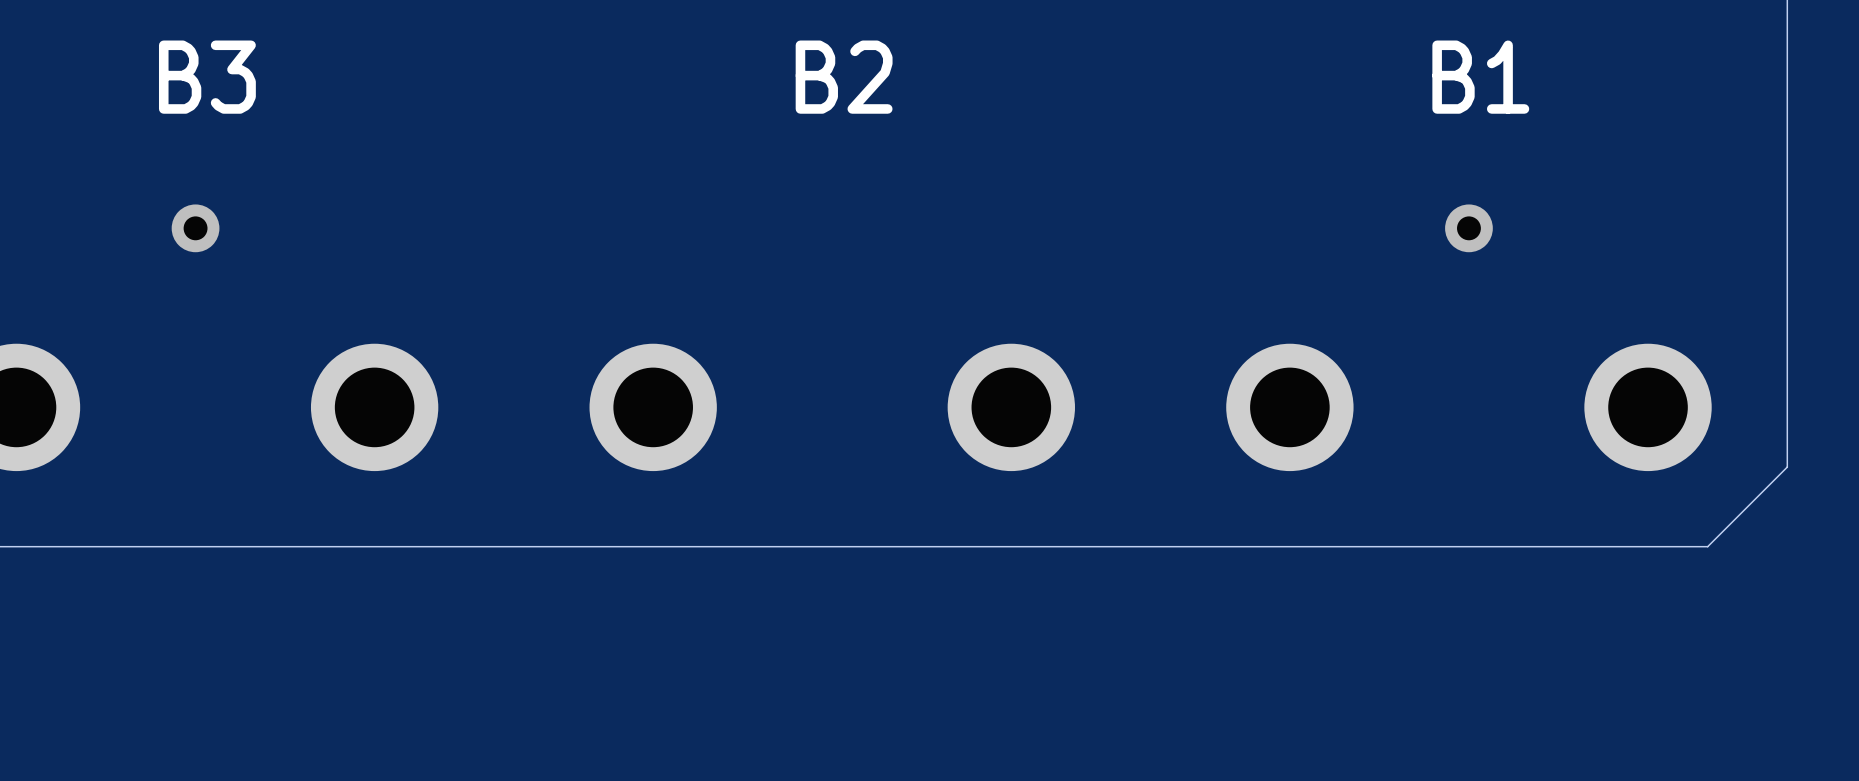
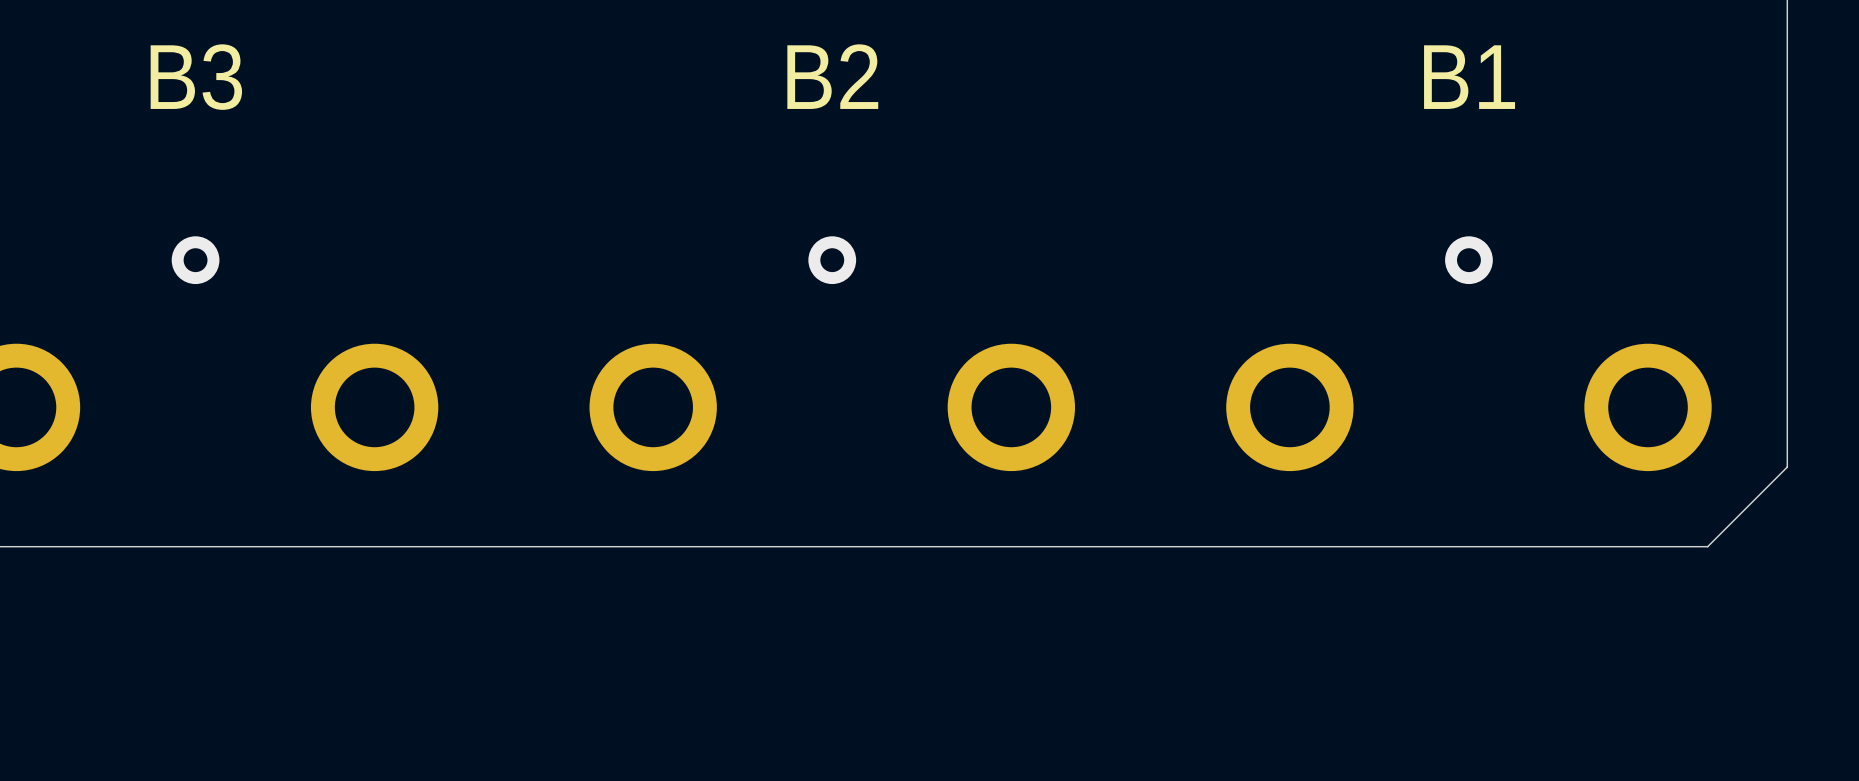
via position: (195, 228) -> (195, 260)
via position: (1468, 228) -> (1468, 260)
via: none -> (832, 260)

